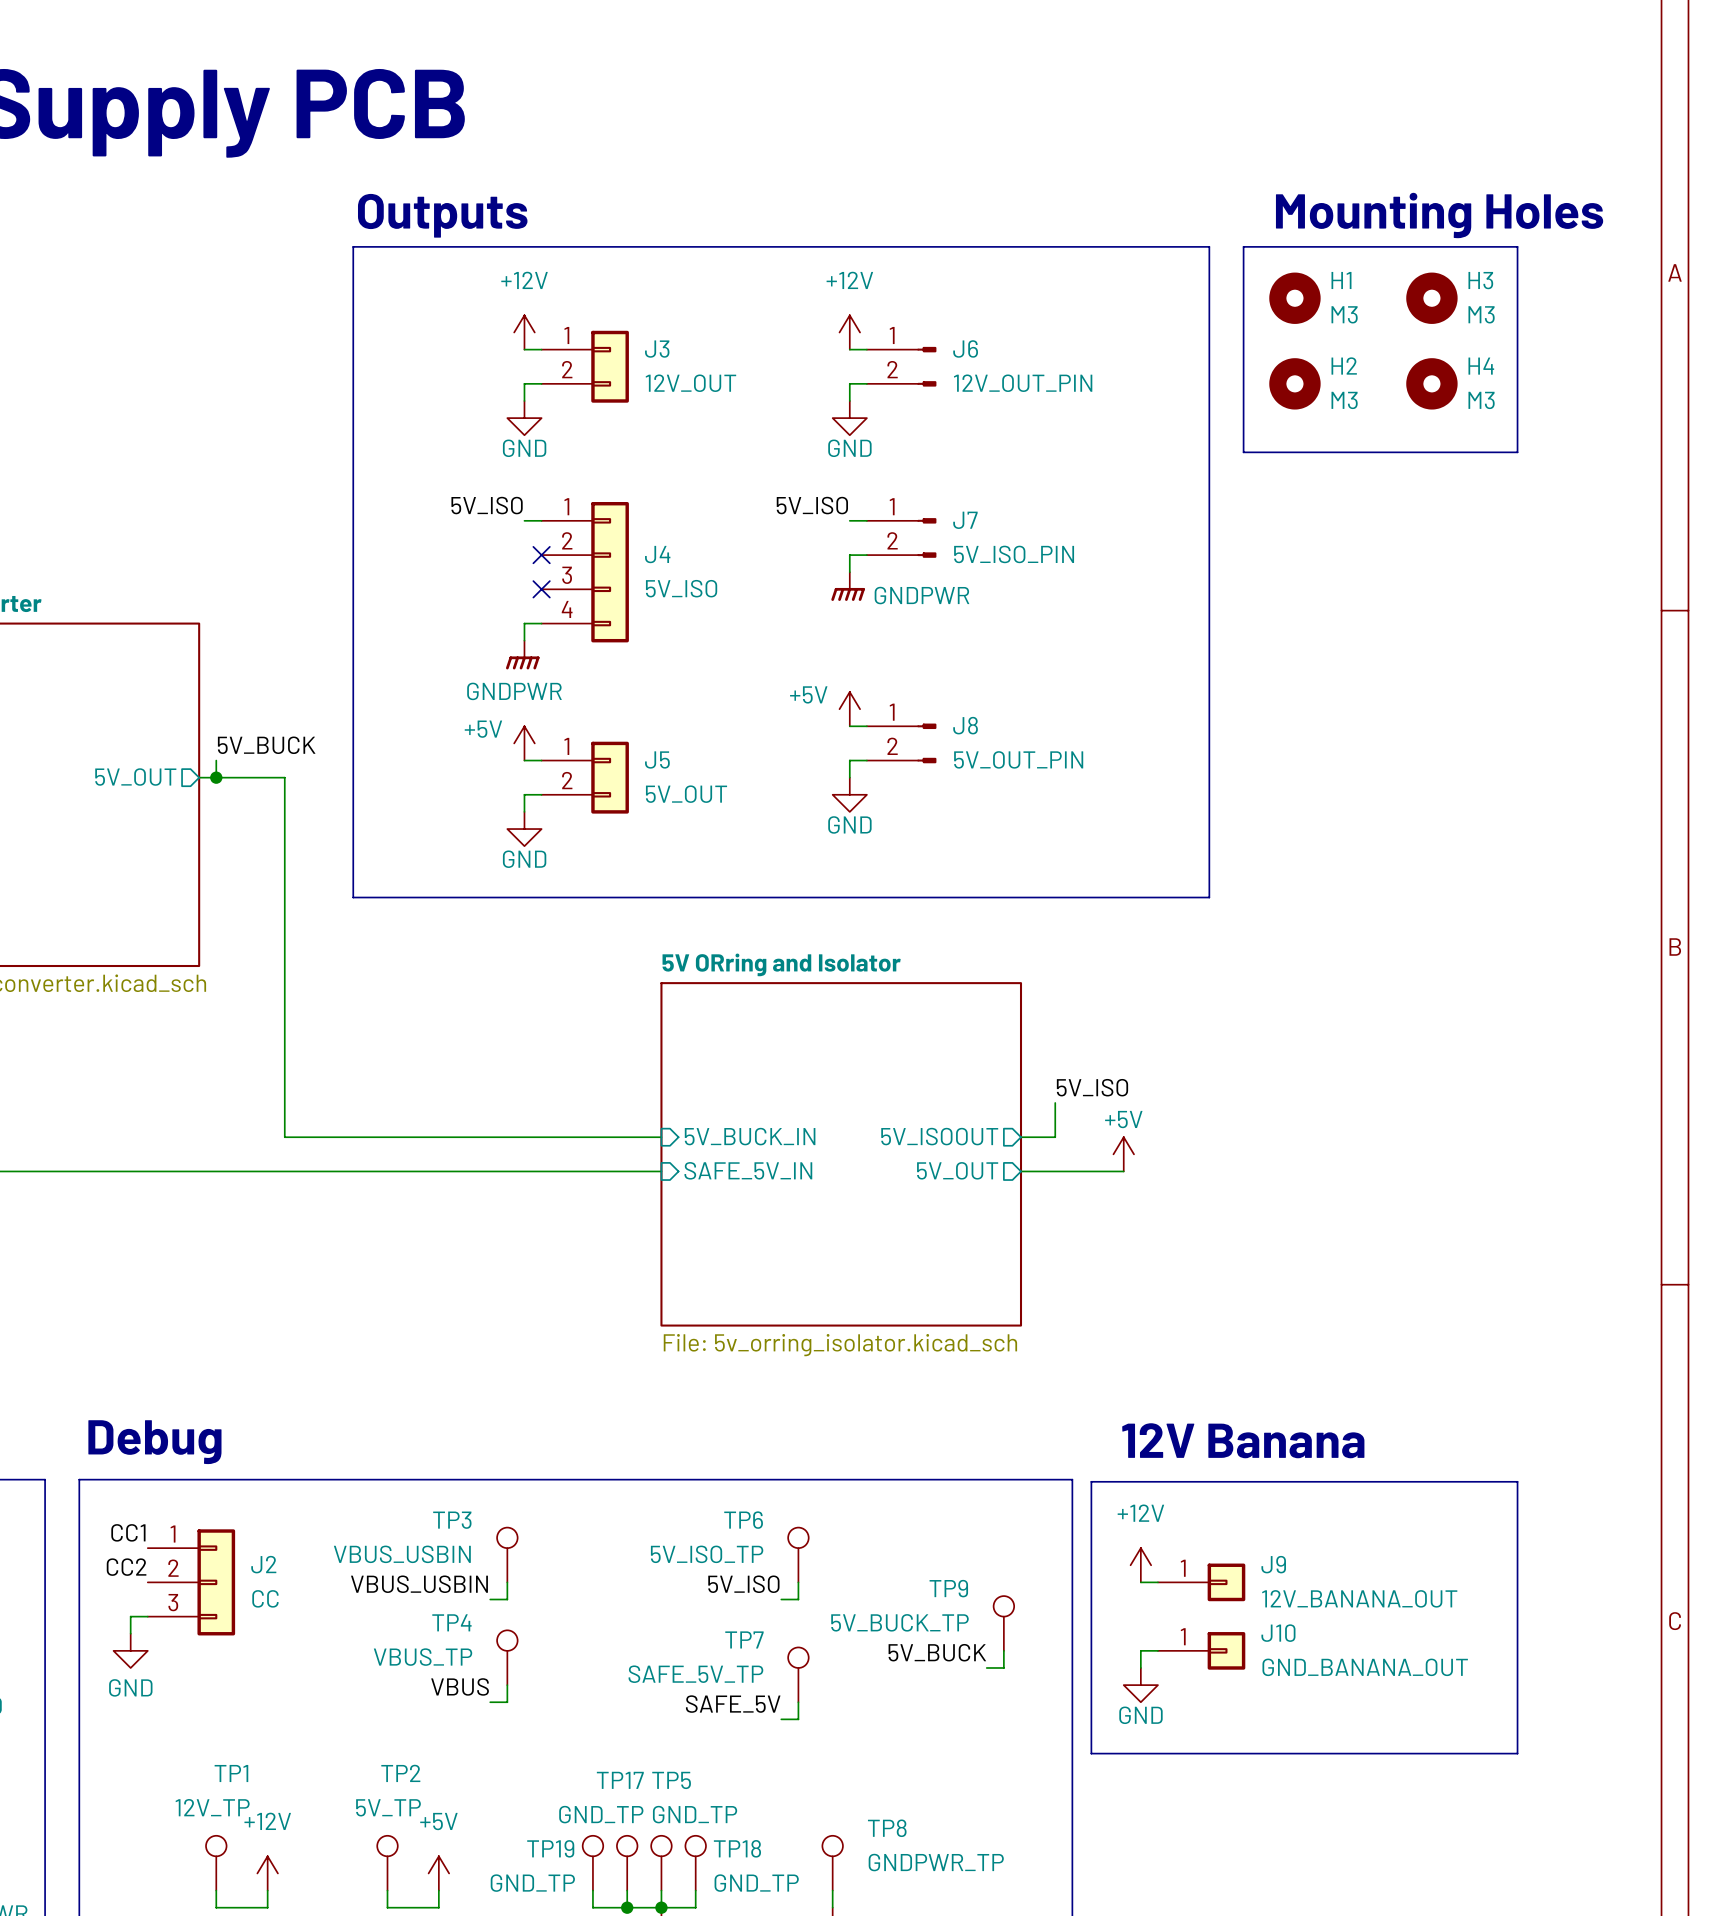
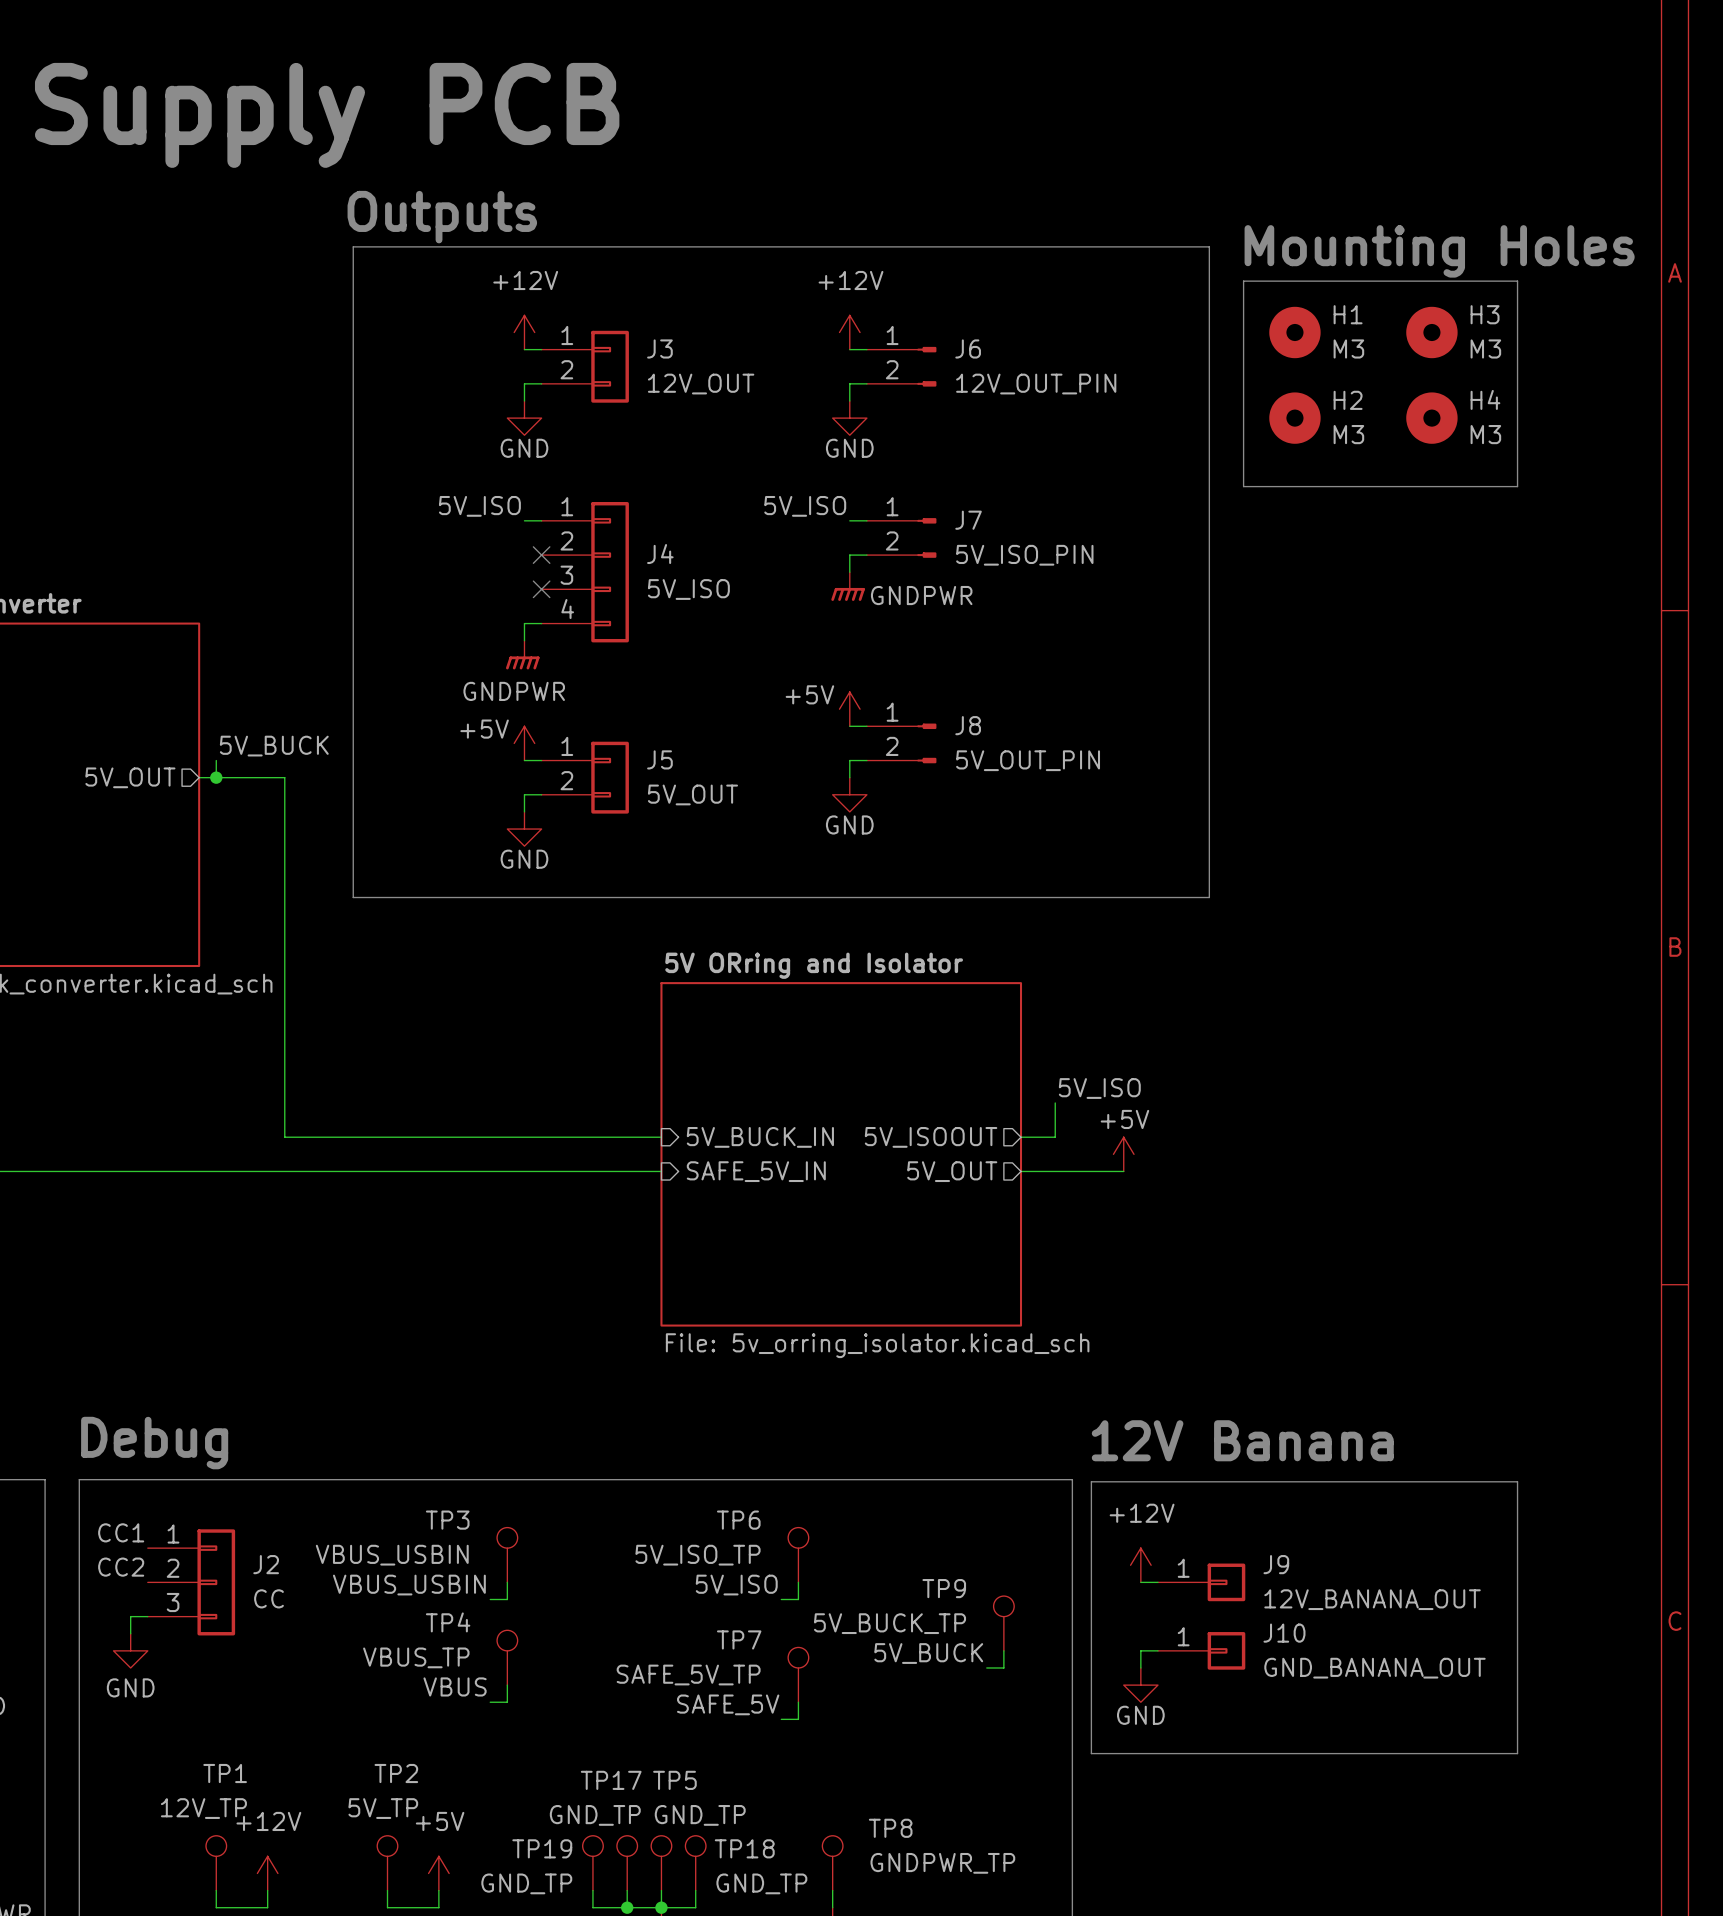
text position: Mounting Holes (1439, 215) -> Mounting Holes (1439, 251)
line: (1243, 281) (1243, 246) (1517, 246) (1517, 281) -> (1243, 281) (1517, 281)
H1 position: (1294, 298) -> (1294, 332)
H3 position: (1431, 298) -> (1431, 332)
H2 position: (1294, 383) -> (1294, 418)
H4 position: (1431, 383) -> (1431, 418)
line: (1243, 452) (1517, 452) -> (1243, 452) (1243, 486) (1517, 486) (1517, 452)

